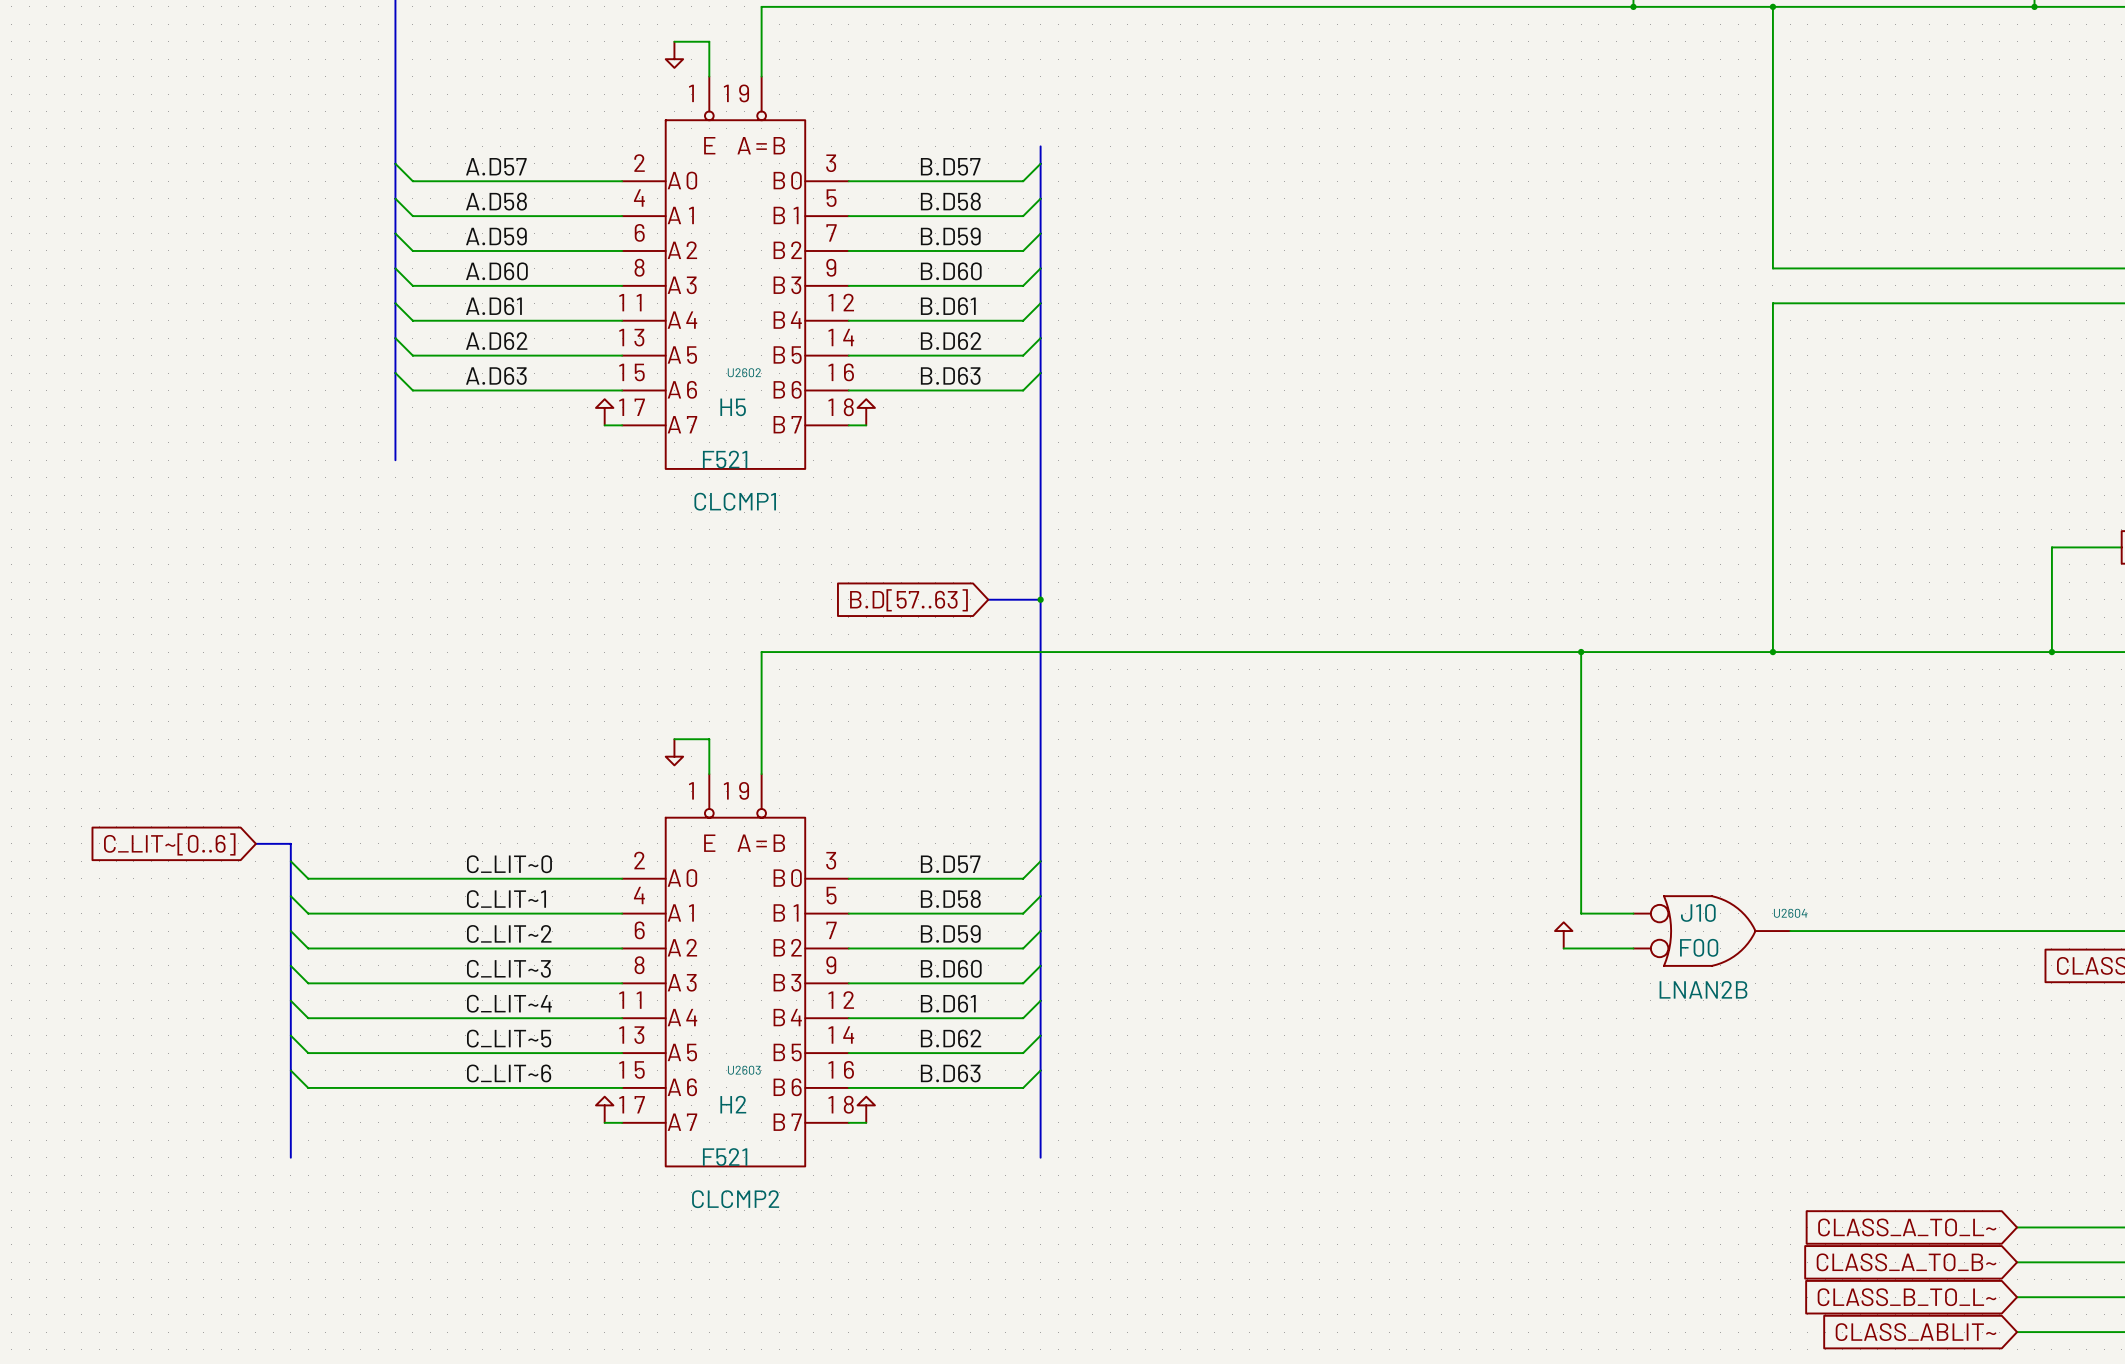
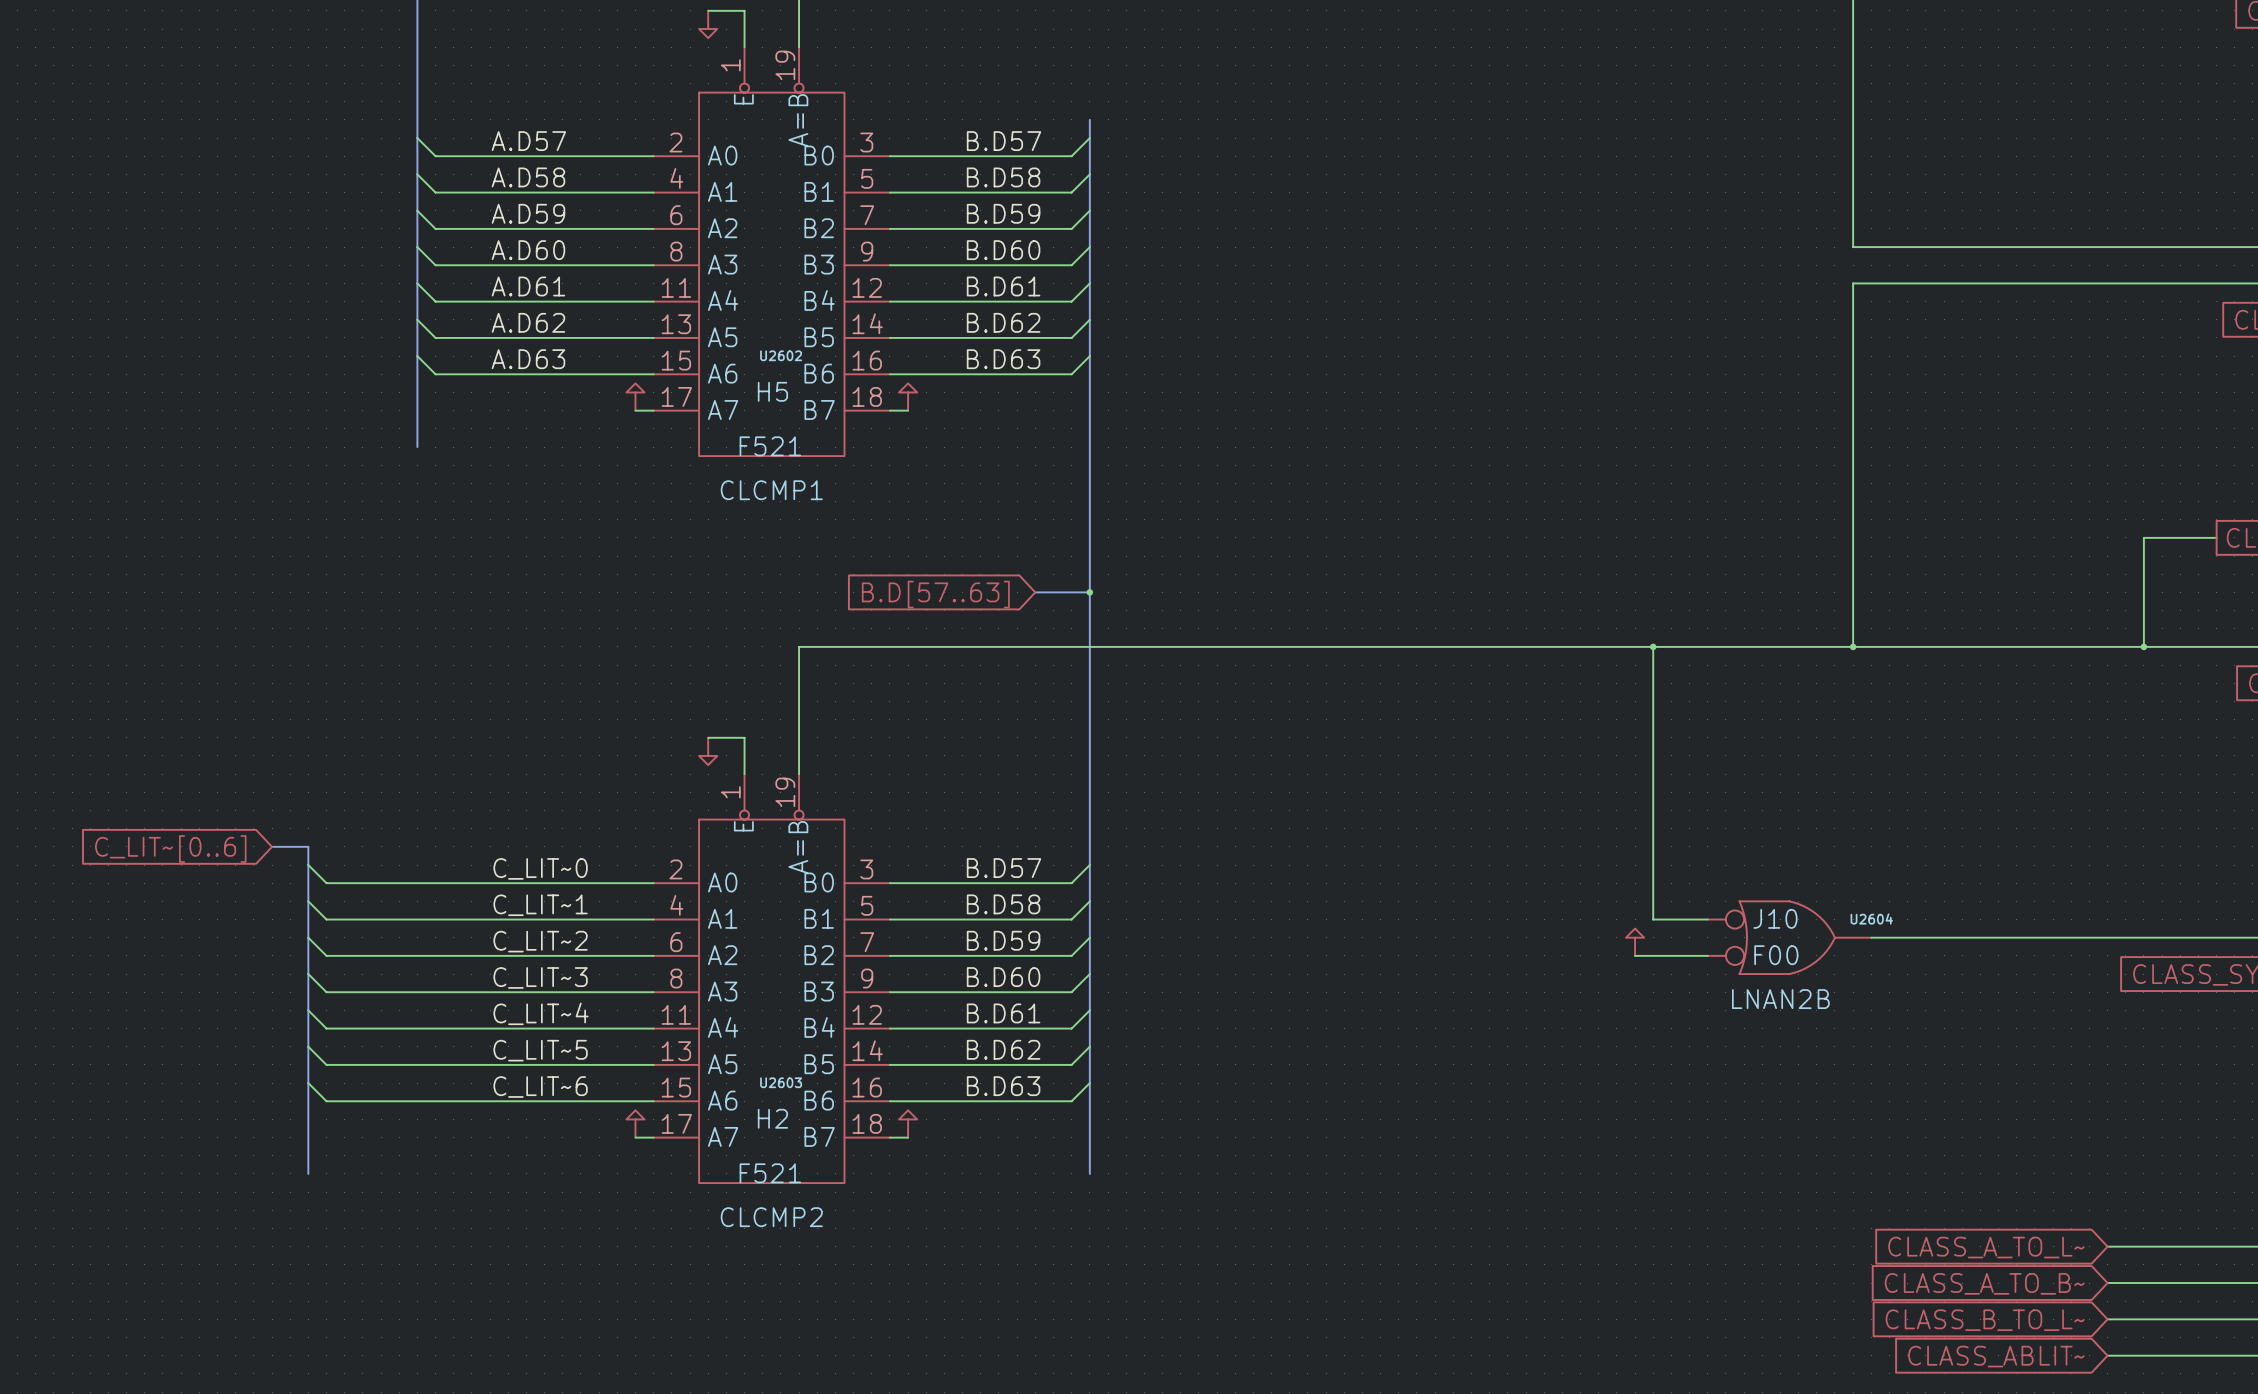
U2602 symbol: [622, 76, 849, 469] -> [653, 47, 890, 457]
U2603 symbol: [622, 774, 849, 1167] -> [653, 774, 890, 1184]

